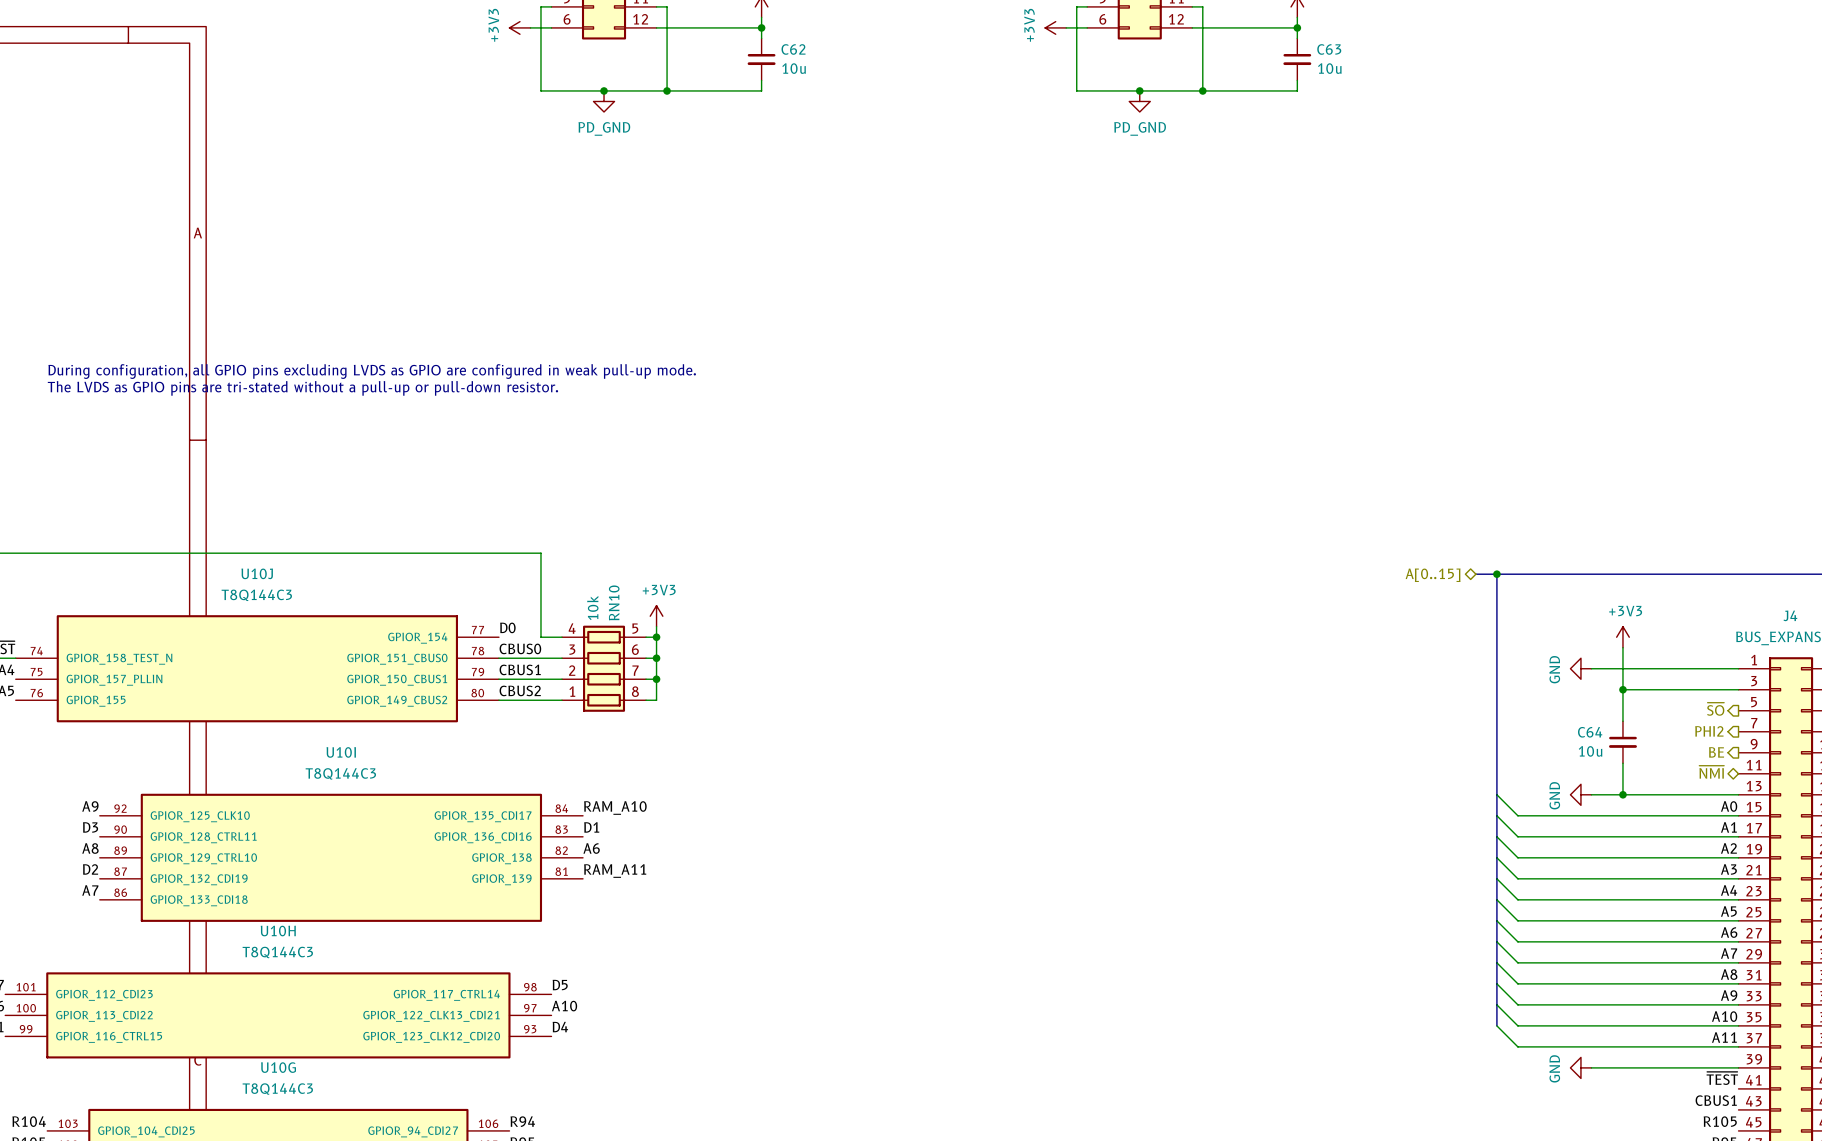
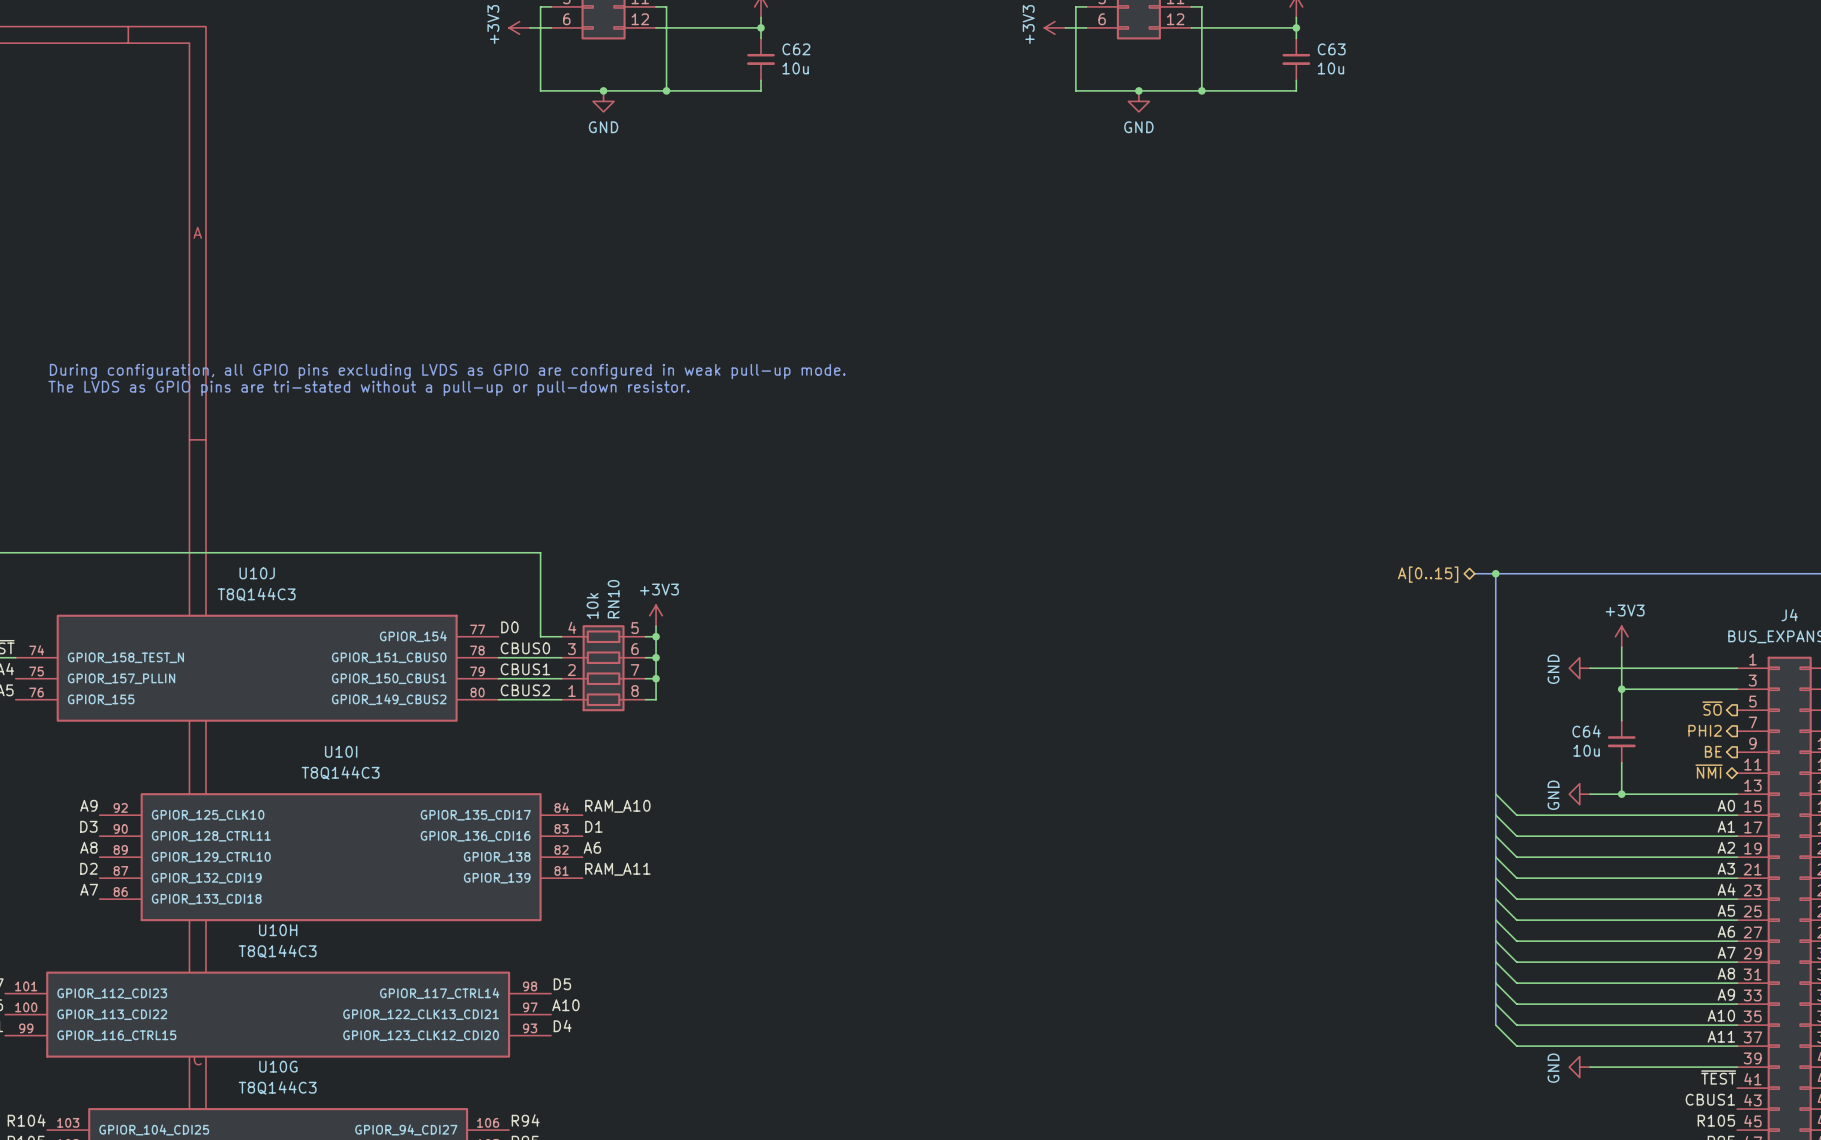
power symbol: PD_GND (604, 101) -> GND (603, 101)
power symbol: PD_GND (1139, 101) -> GND (1138, 101)

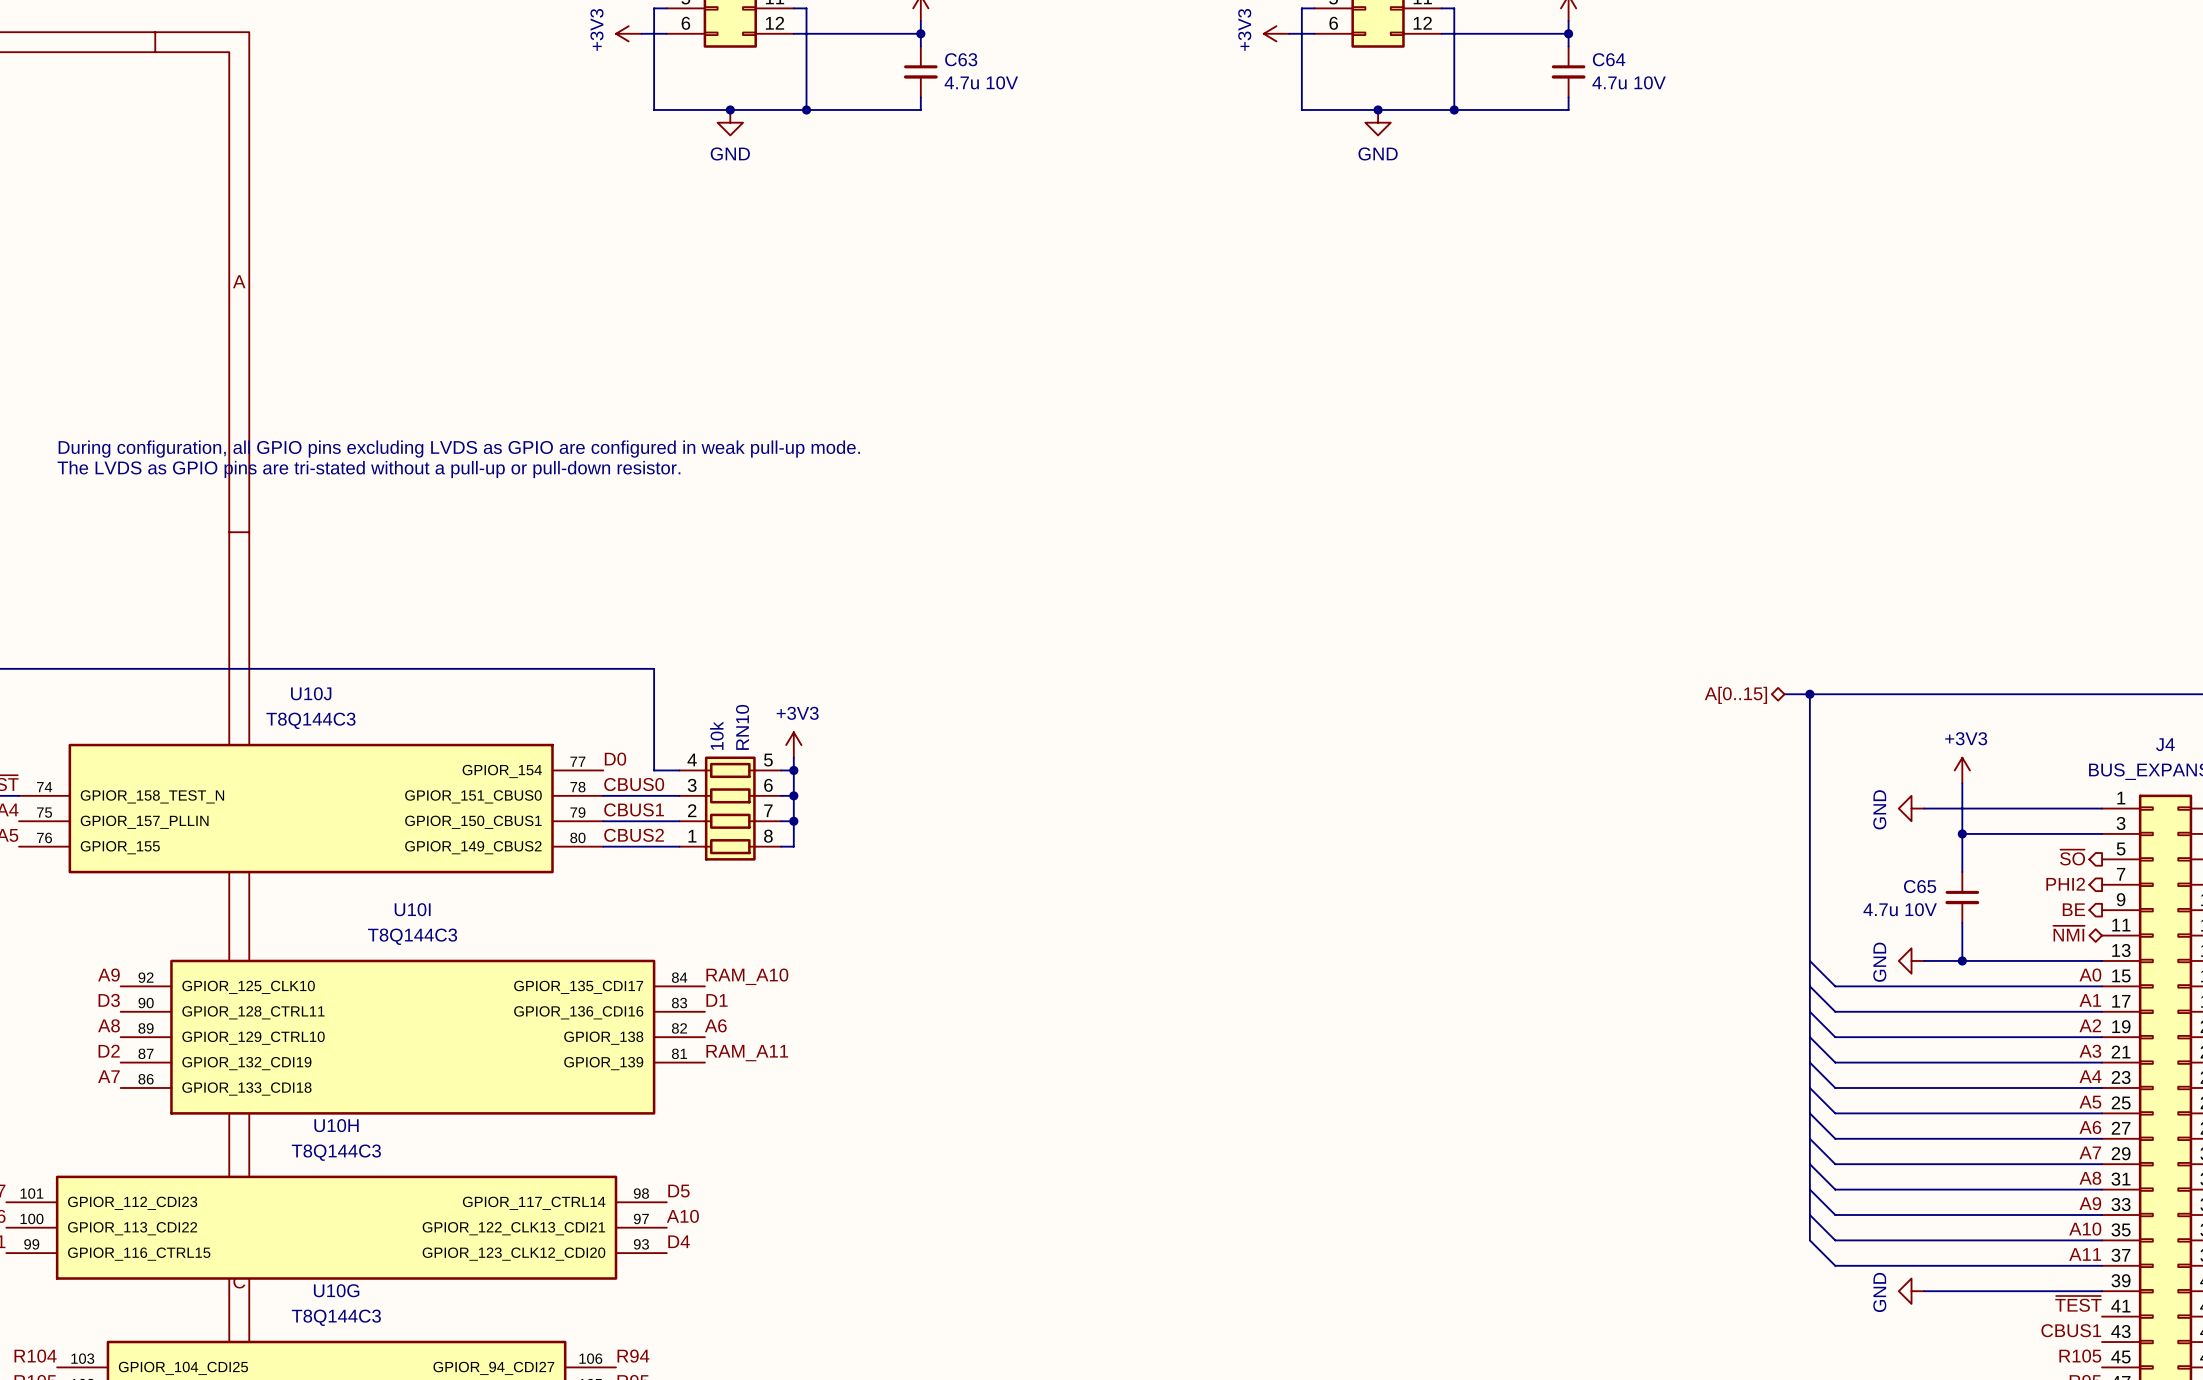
C62 name: C62 (796, 49) -> C63 (961, 59)
C63 name: C63 (1331, 49) -> C64 (1609, 59)
C62 value: 10u (795, 68) -> 4.7u 10V (981, 82)
C63 value: 10u (1330, 68) -> 4.7u 10V (1629, 82)
C64 name: C64 (1586, 731) -> C65 (1920, 886)
C64 value: 10u (1586, 750) -> 4.7u 10V (1900, 909)

